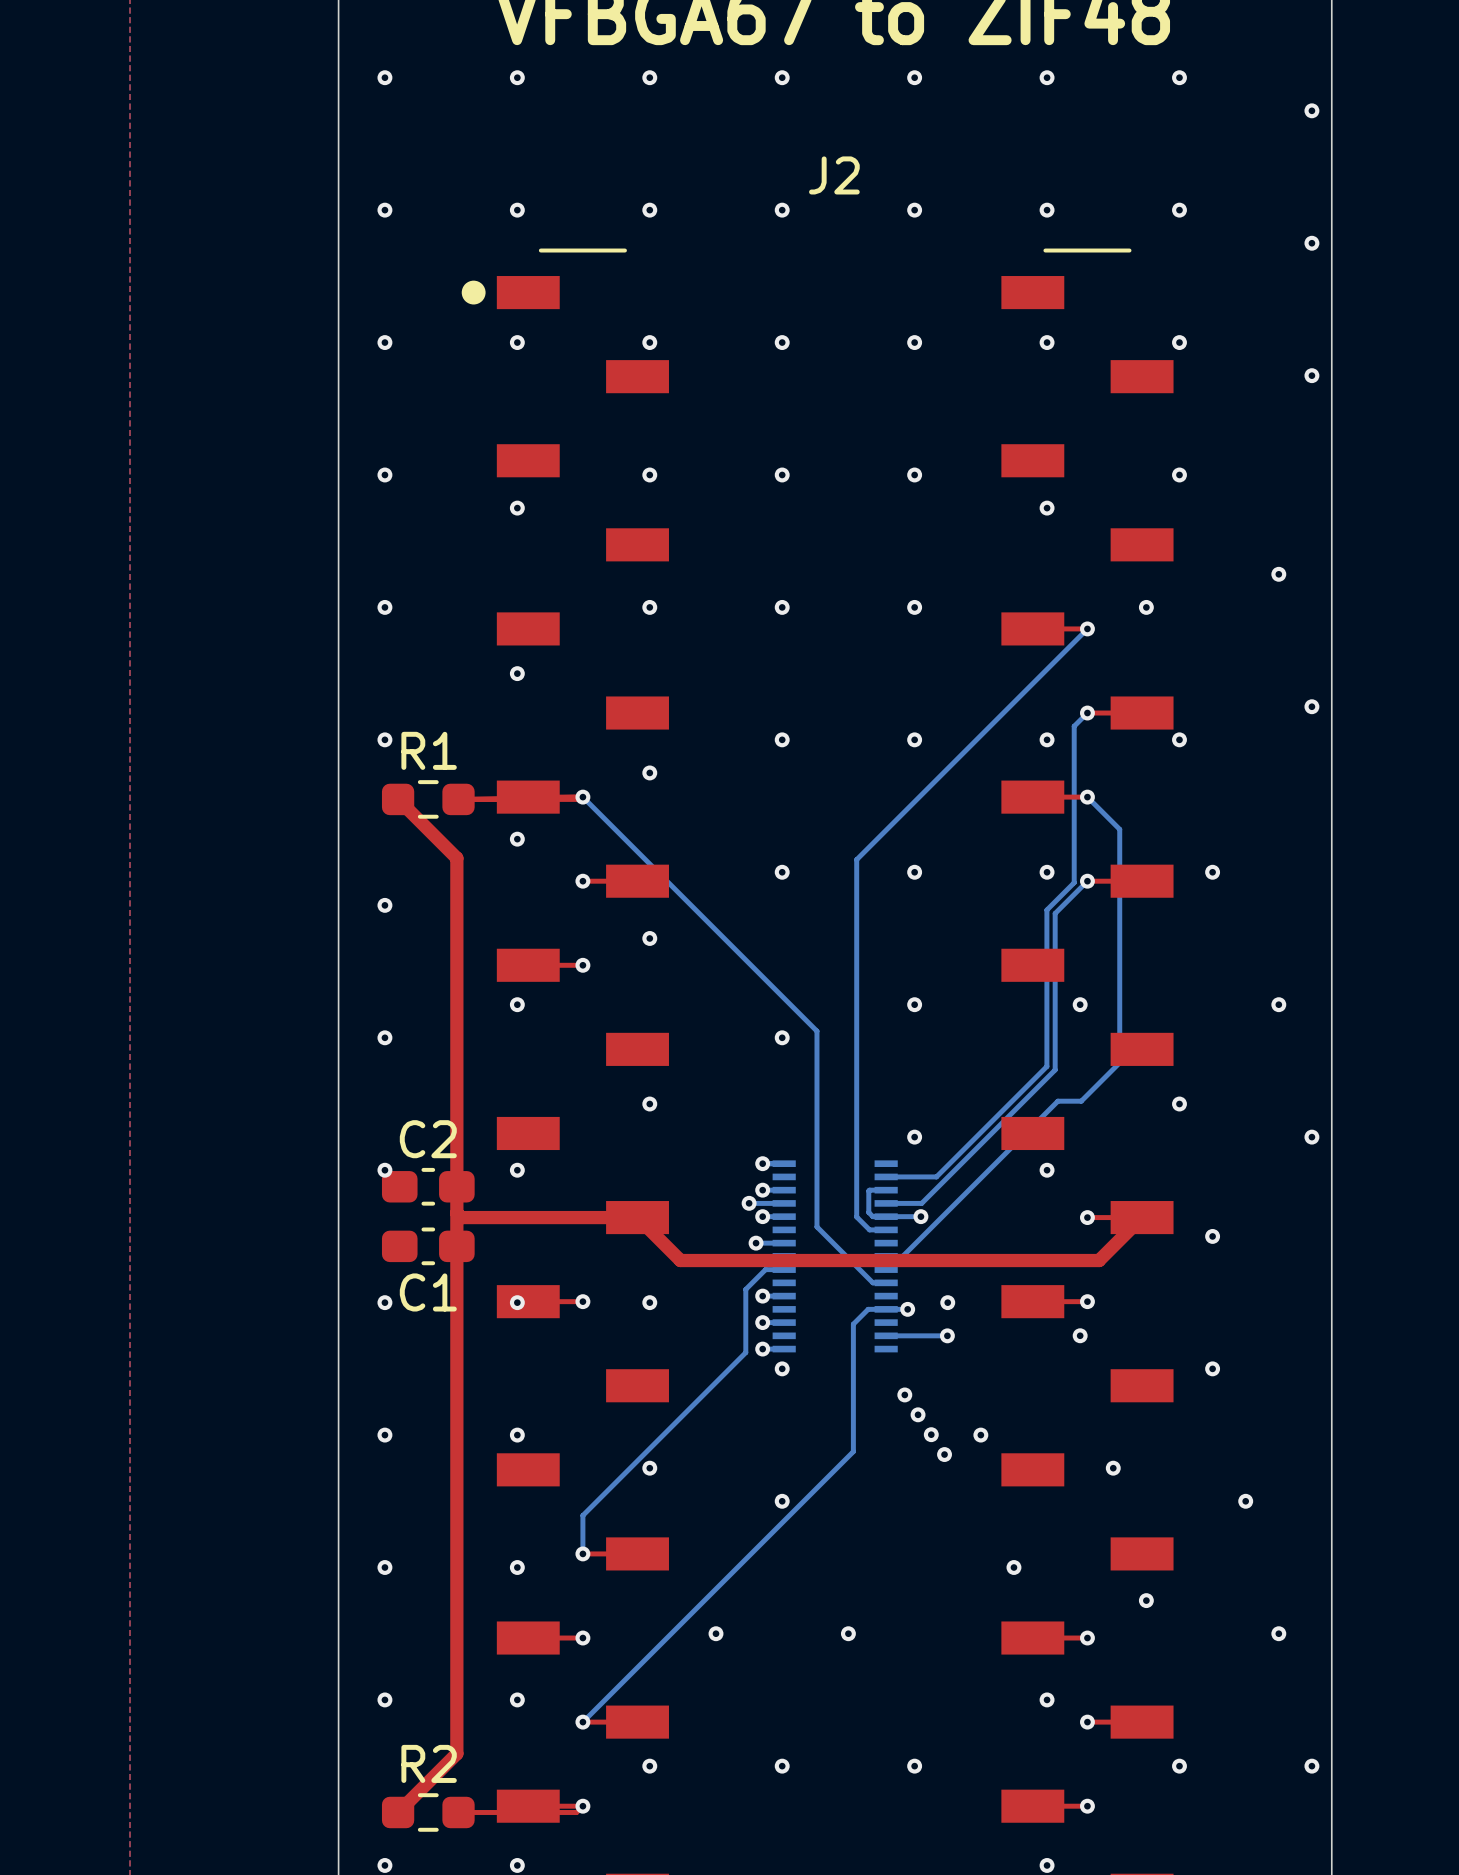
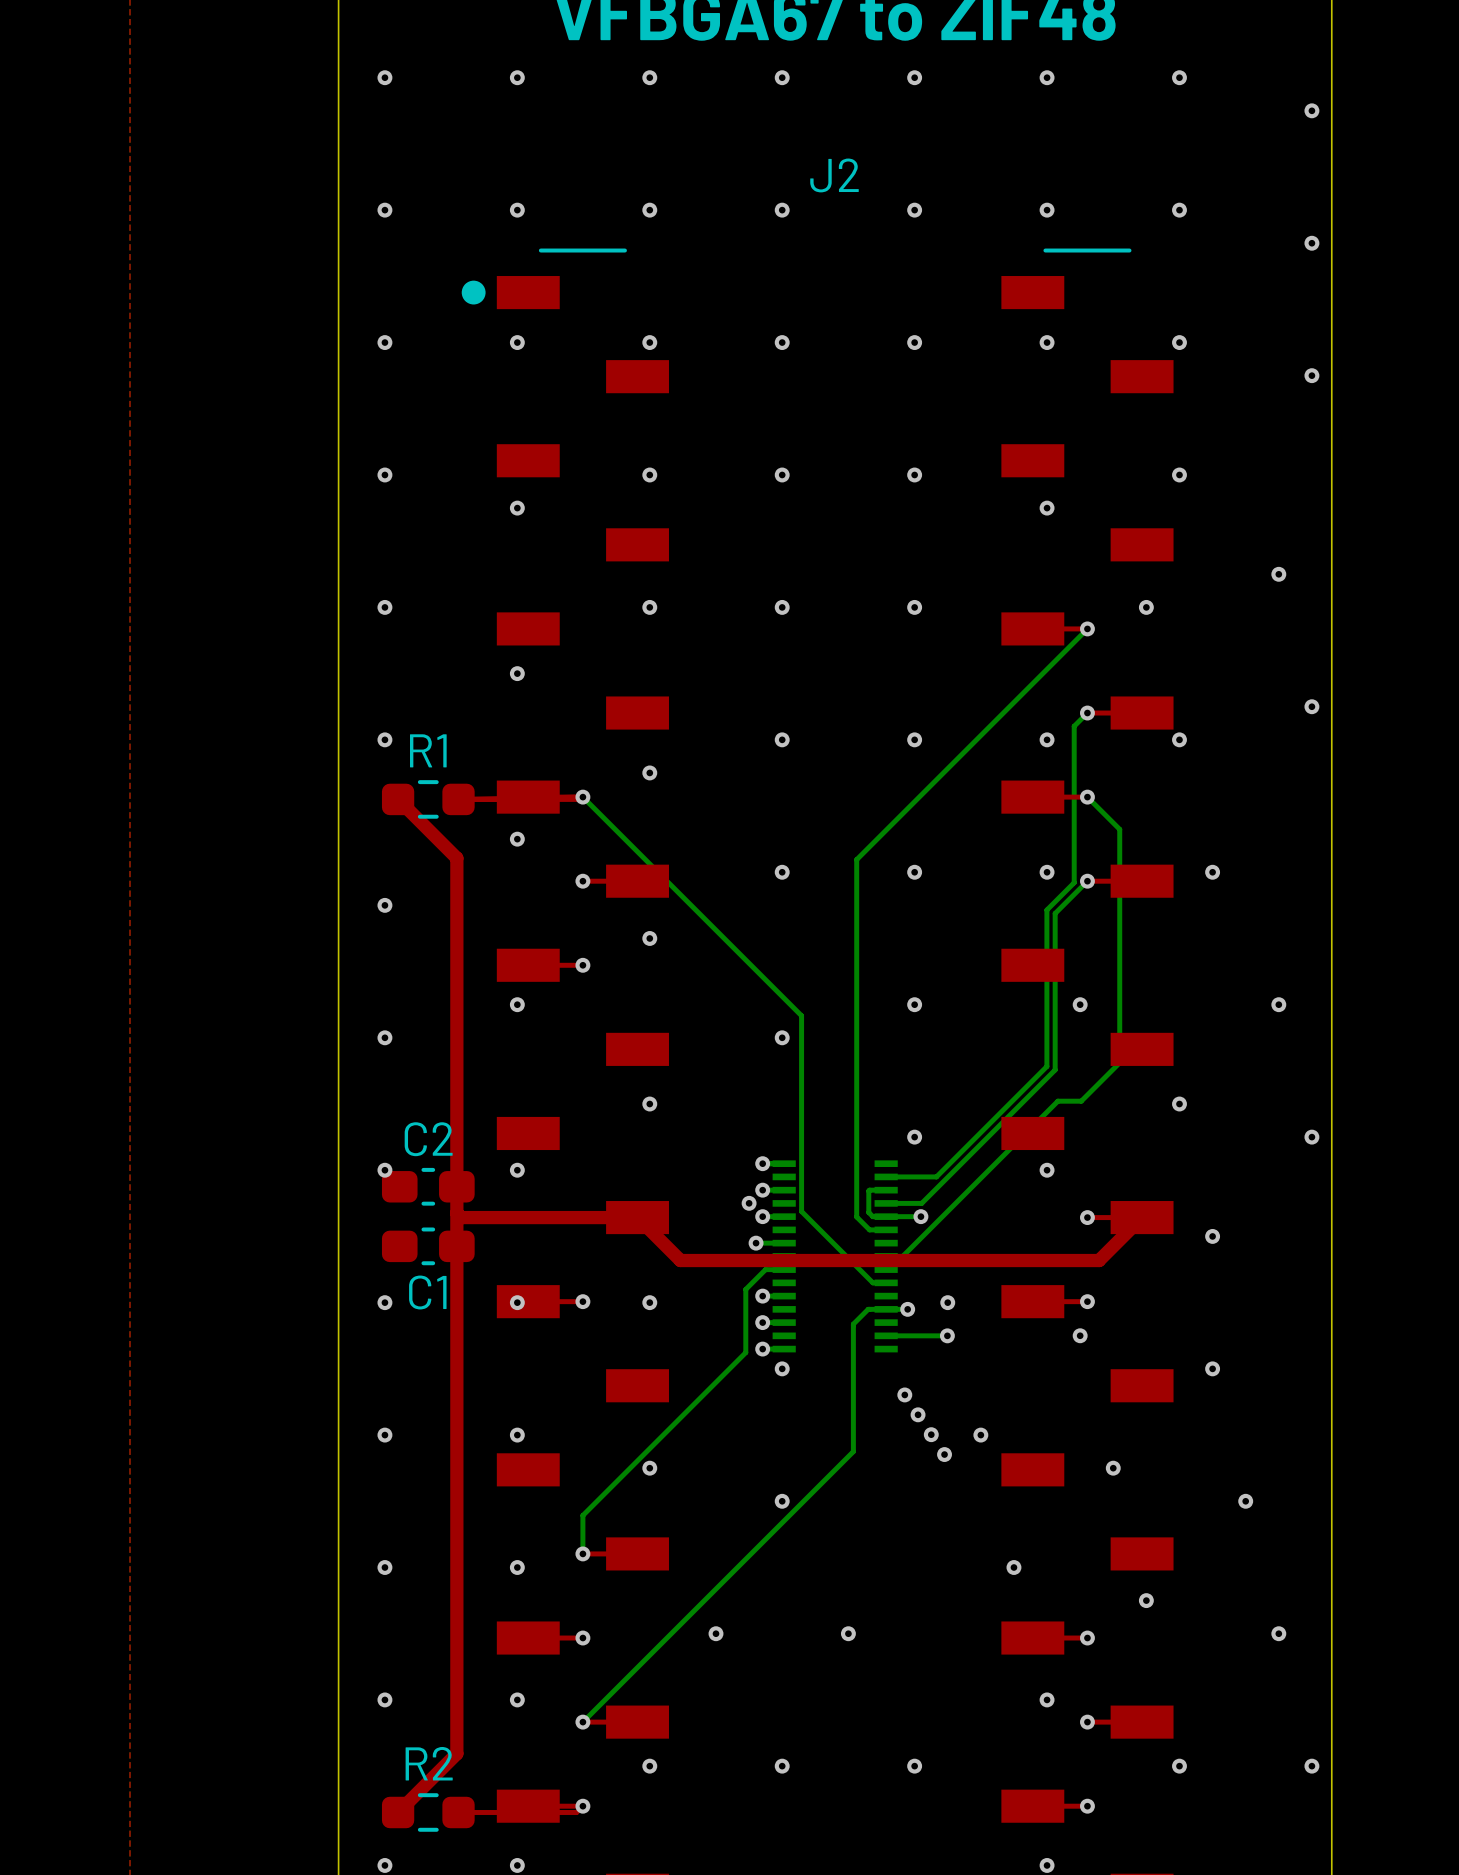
bottom track: (801, 1015) (816, 1031) (816, 1226) -> (801, 1015) (801, 1211) (816, 1226)
bottom track: (749, 1203) (784, 1203) -> none

